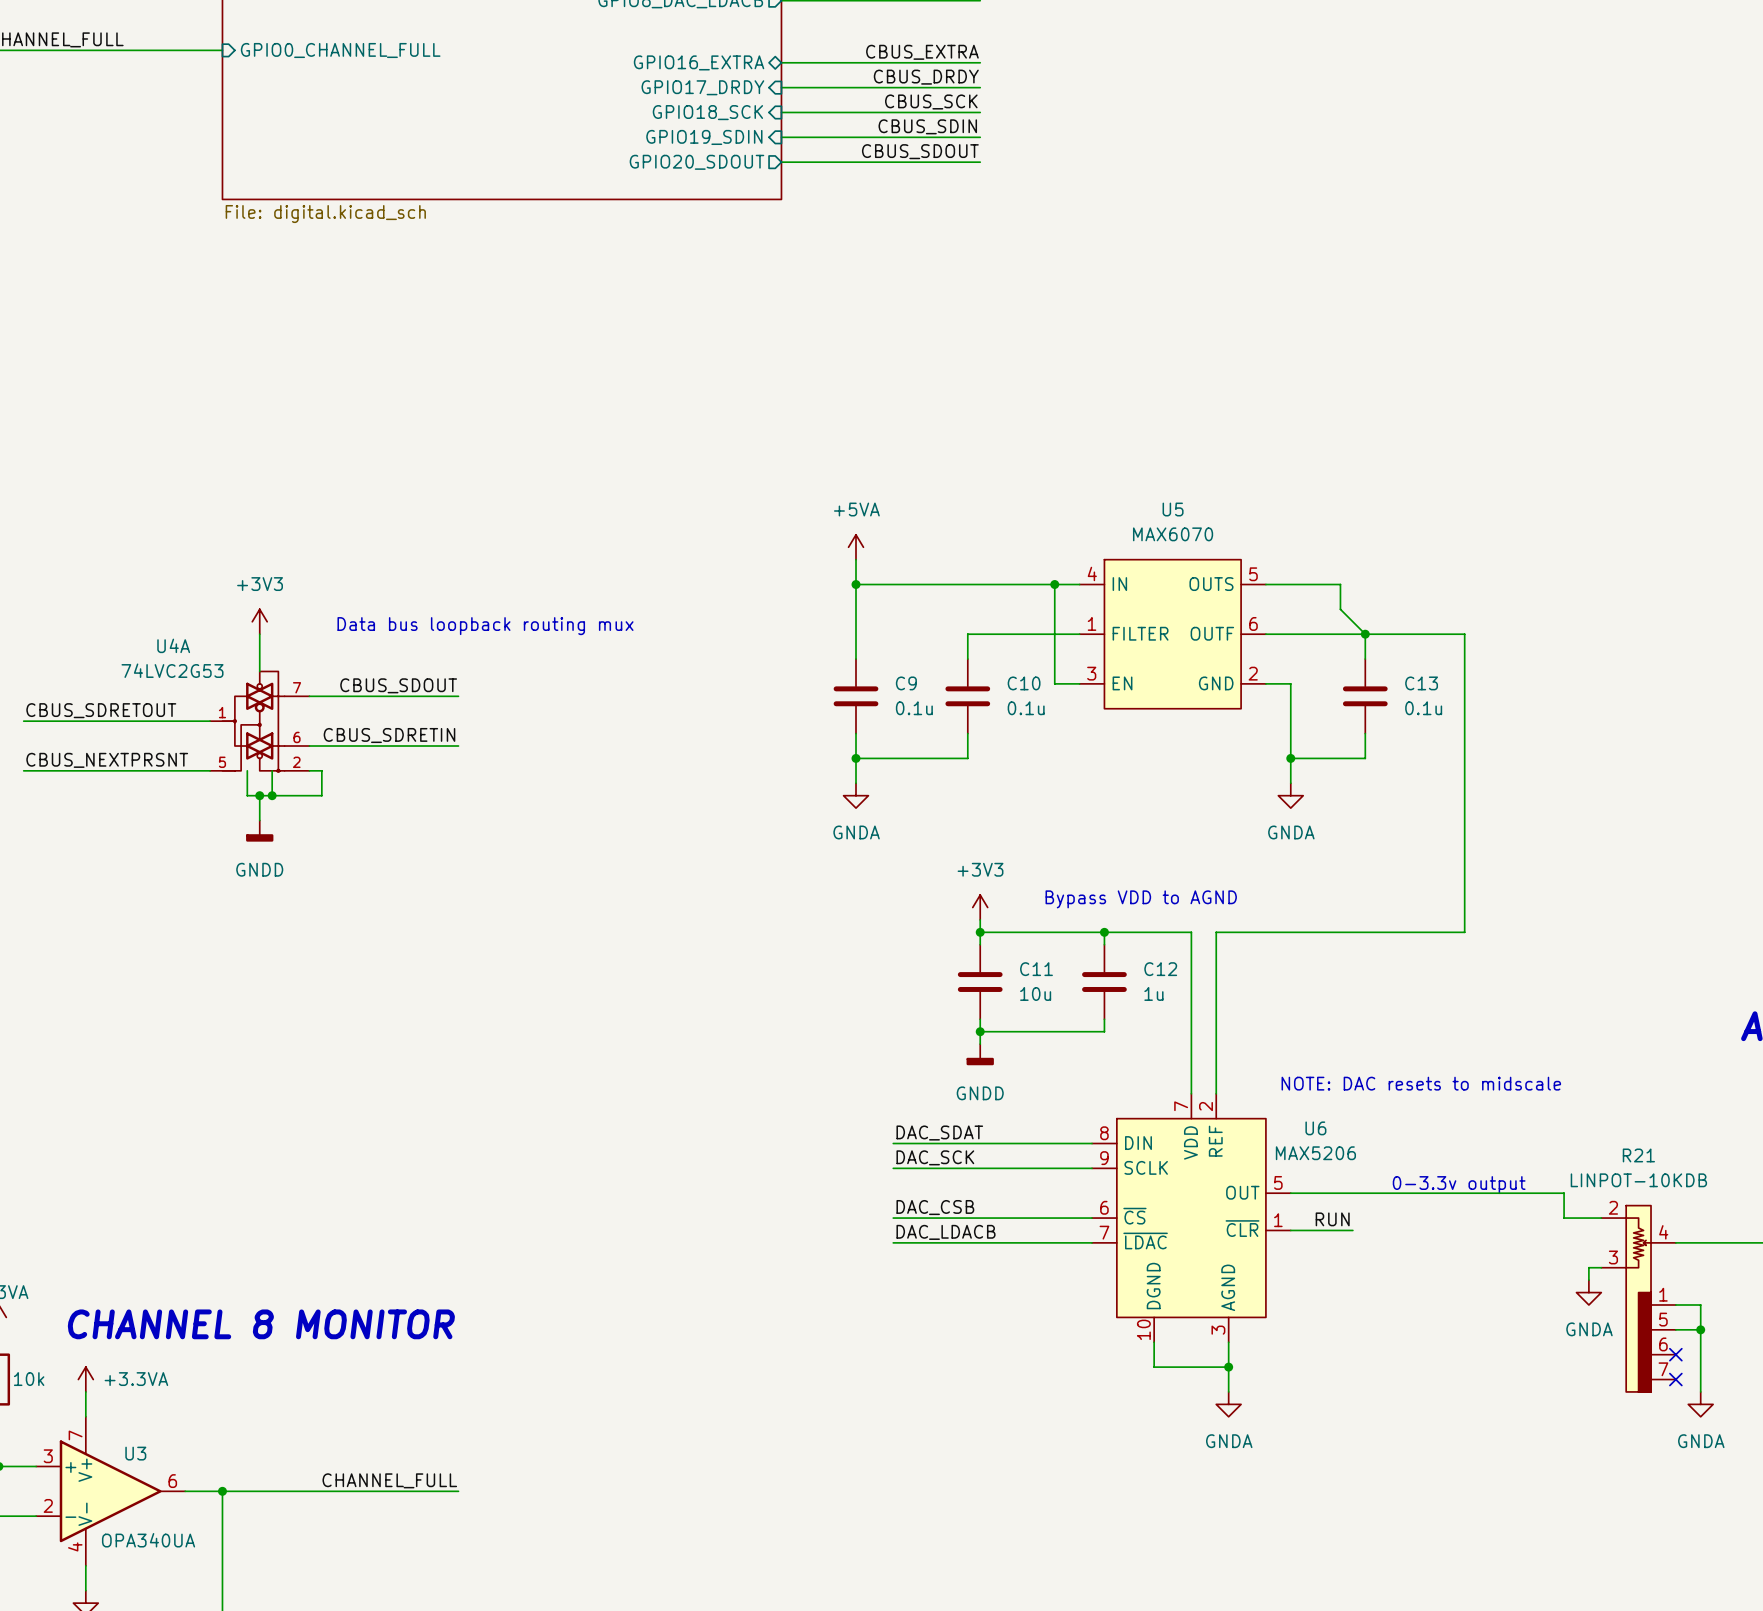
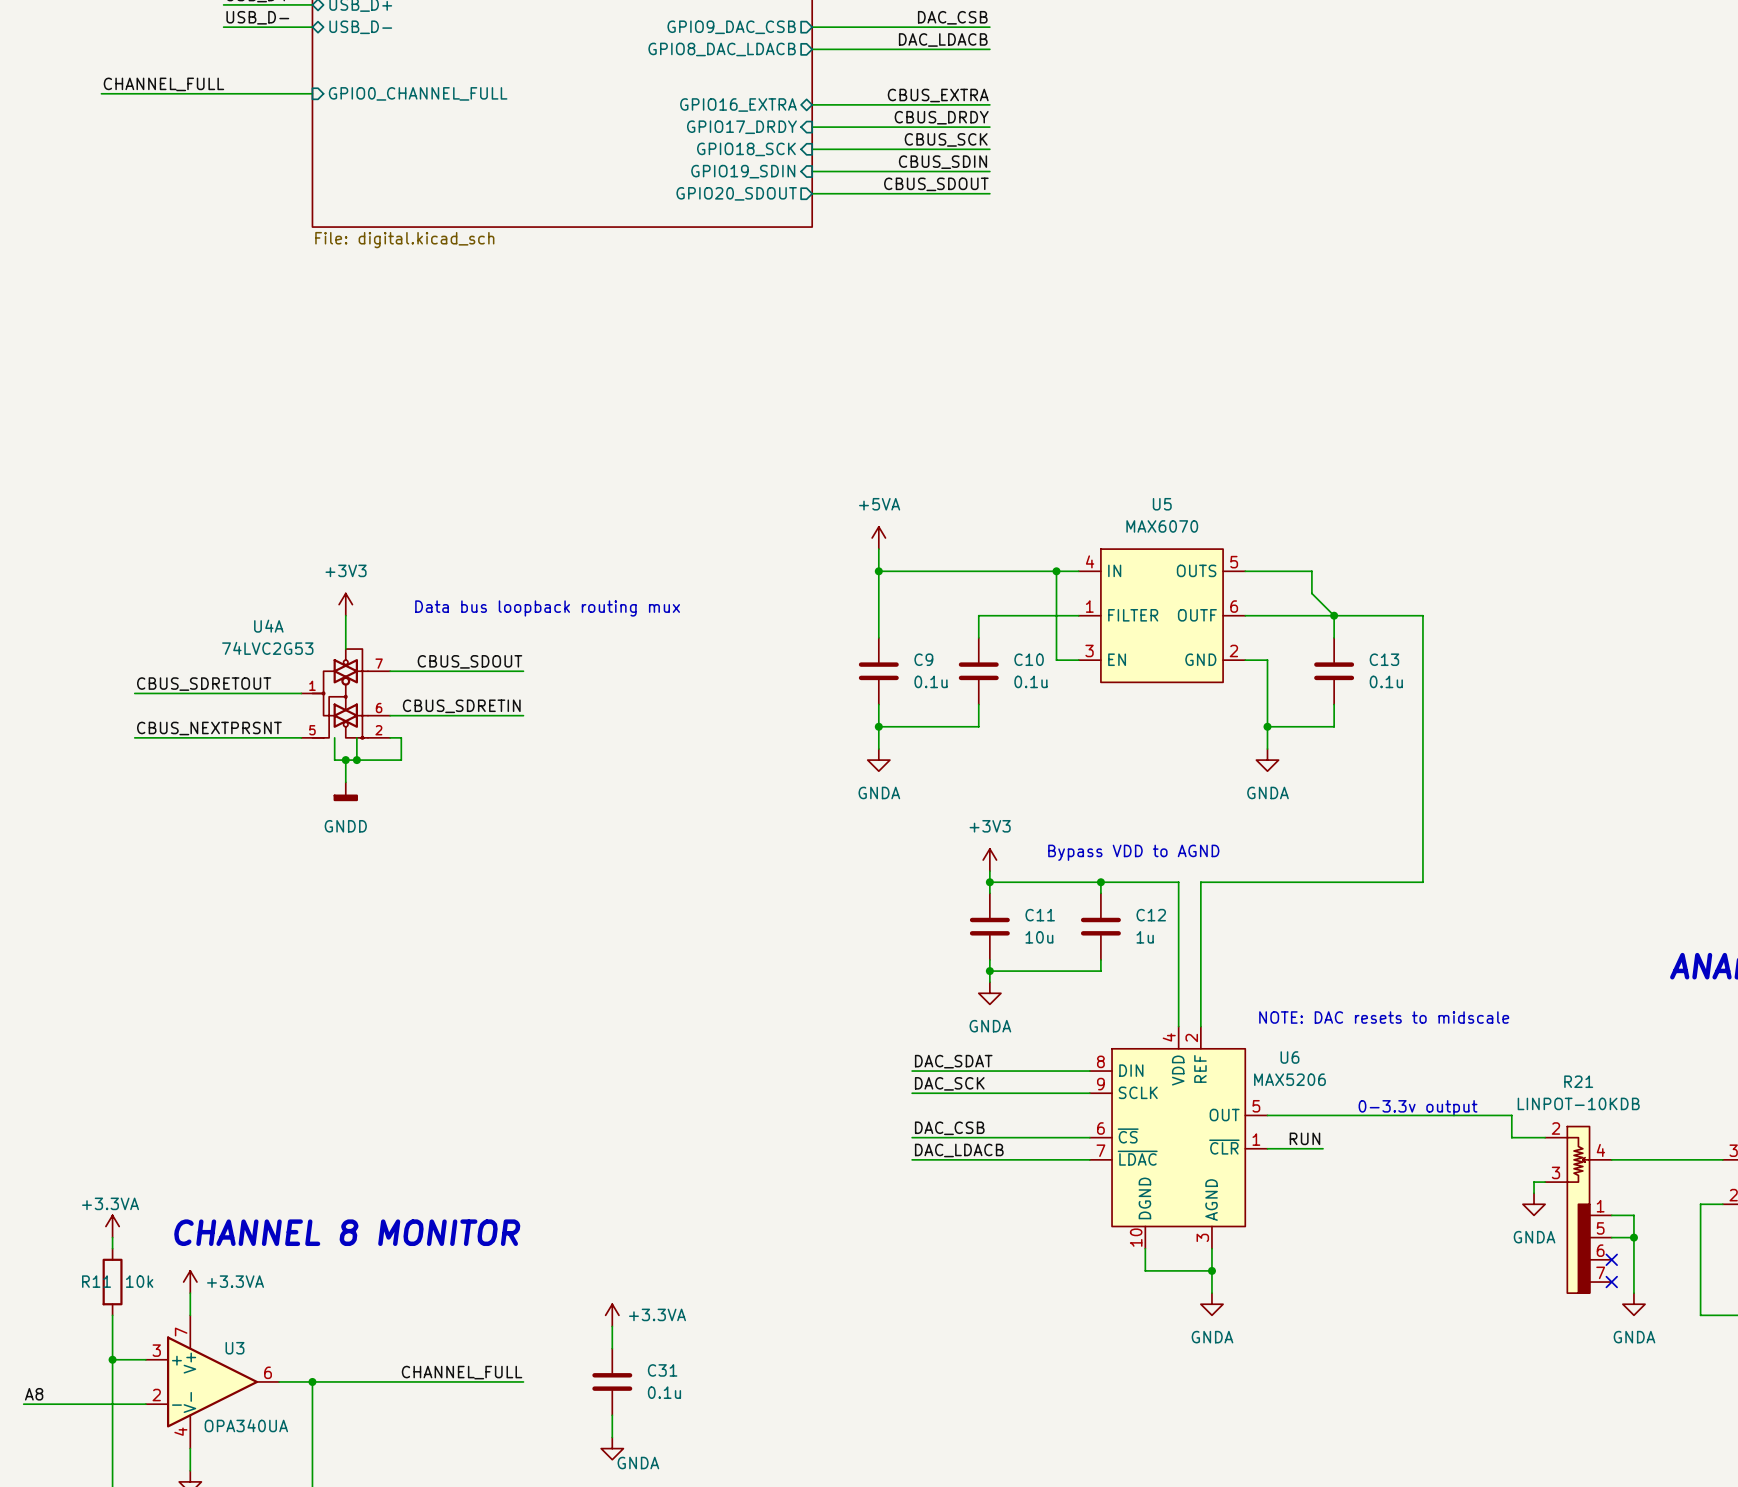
power symbol: GNDD (980, 1054) -> GNDA (989, 993)
U6 pin number: 7 (1181, 1106) -> 4 (1169, 1037)
power symbol: none -> +3.3VA (612, 1315)
wire: none -> (612, 1326) (612, 1348)
C31: none -> 0.1u (612, 1381)
wire: none -> (612, 1415) (612, 1437)
power symbol: none -> GNDA (612, 1448)

